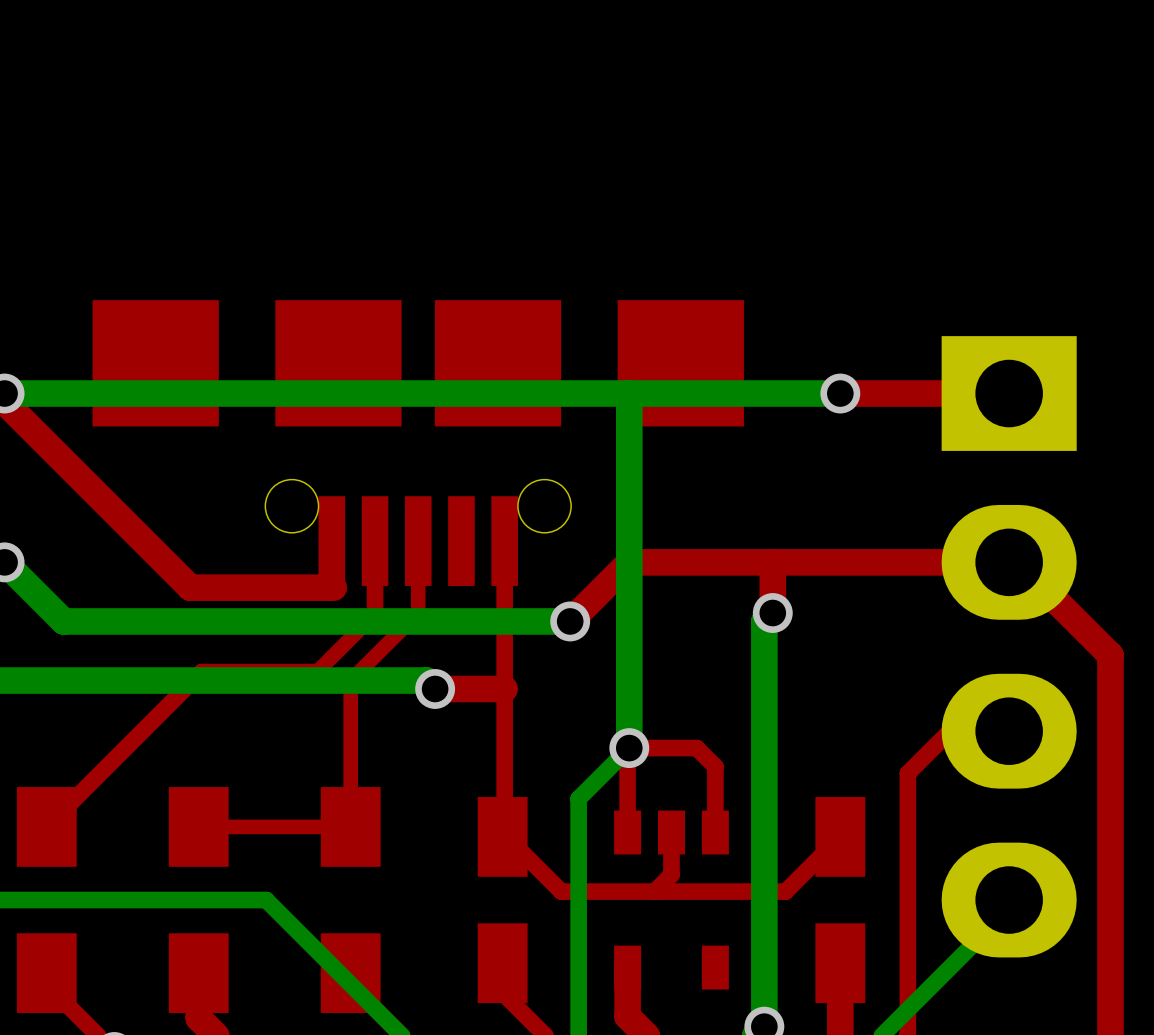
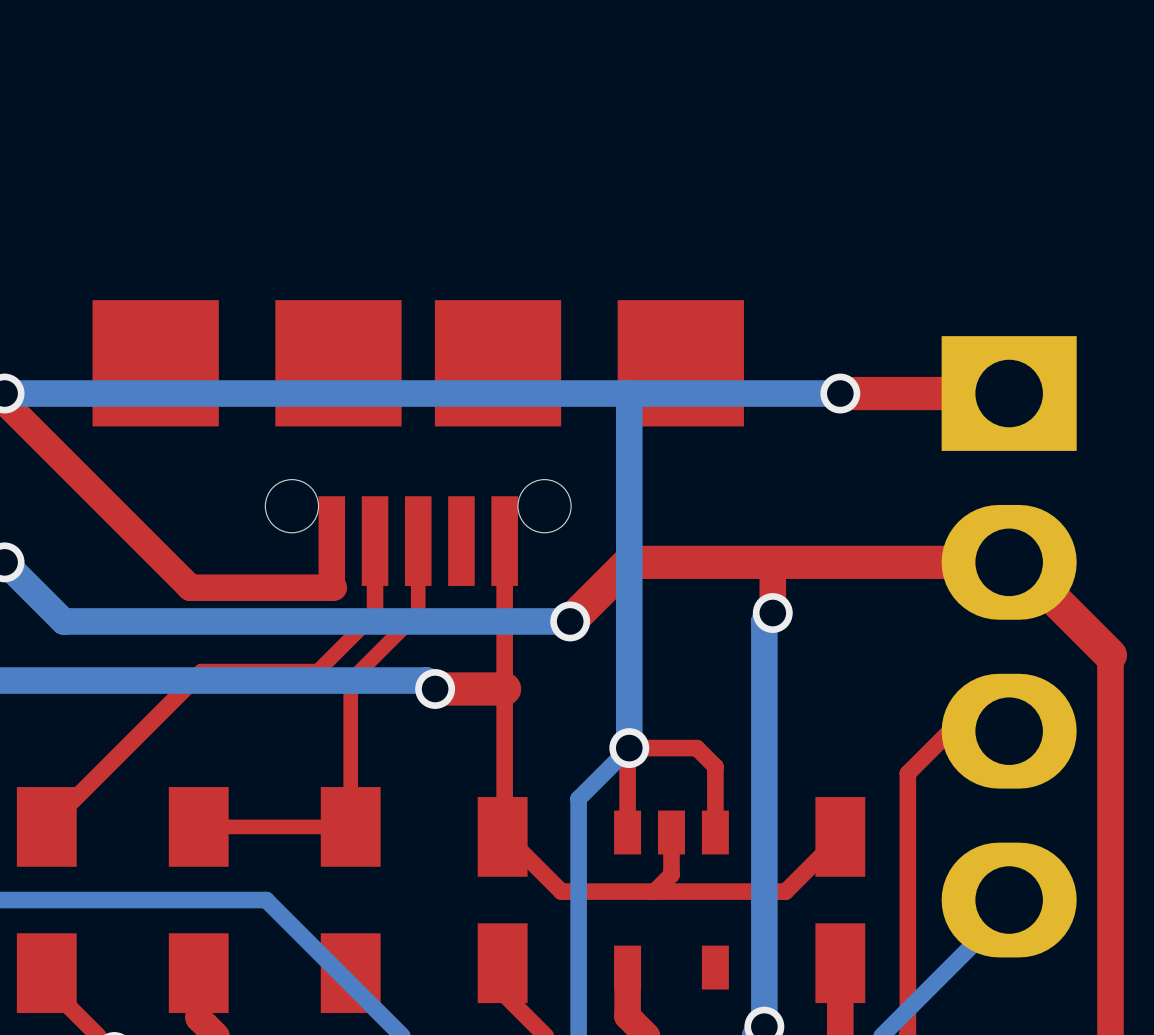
top track width: thin (1009, 393) (840, 393) -> thick (1009, 393) (840, 393)
top track width: thin (1009, 562) (629, 562) (570, 621) -> thick (1009, 562) (629, 562) (570, 621)
top track width: thin (1017, 562) (1110, 655) -> thick (1017, 562) (1110, 655)
top track width: thin (504, 688) (435, 688) -> thick (504, 688) (435, 688)

